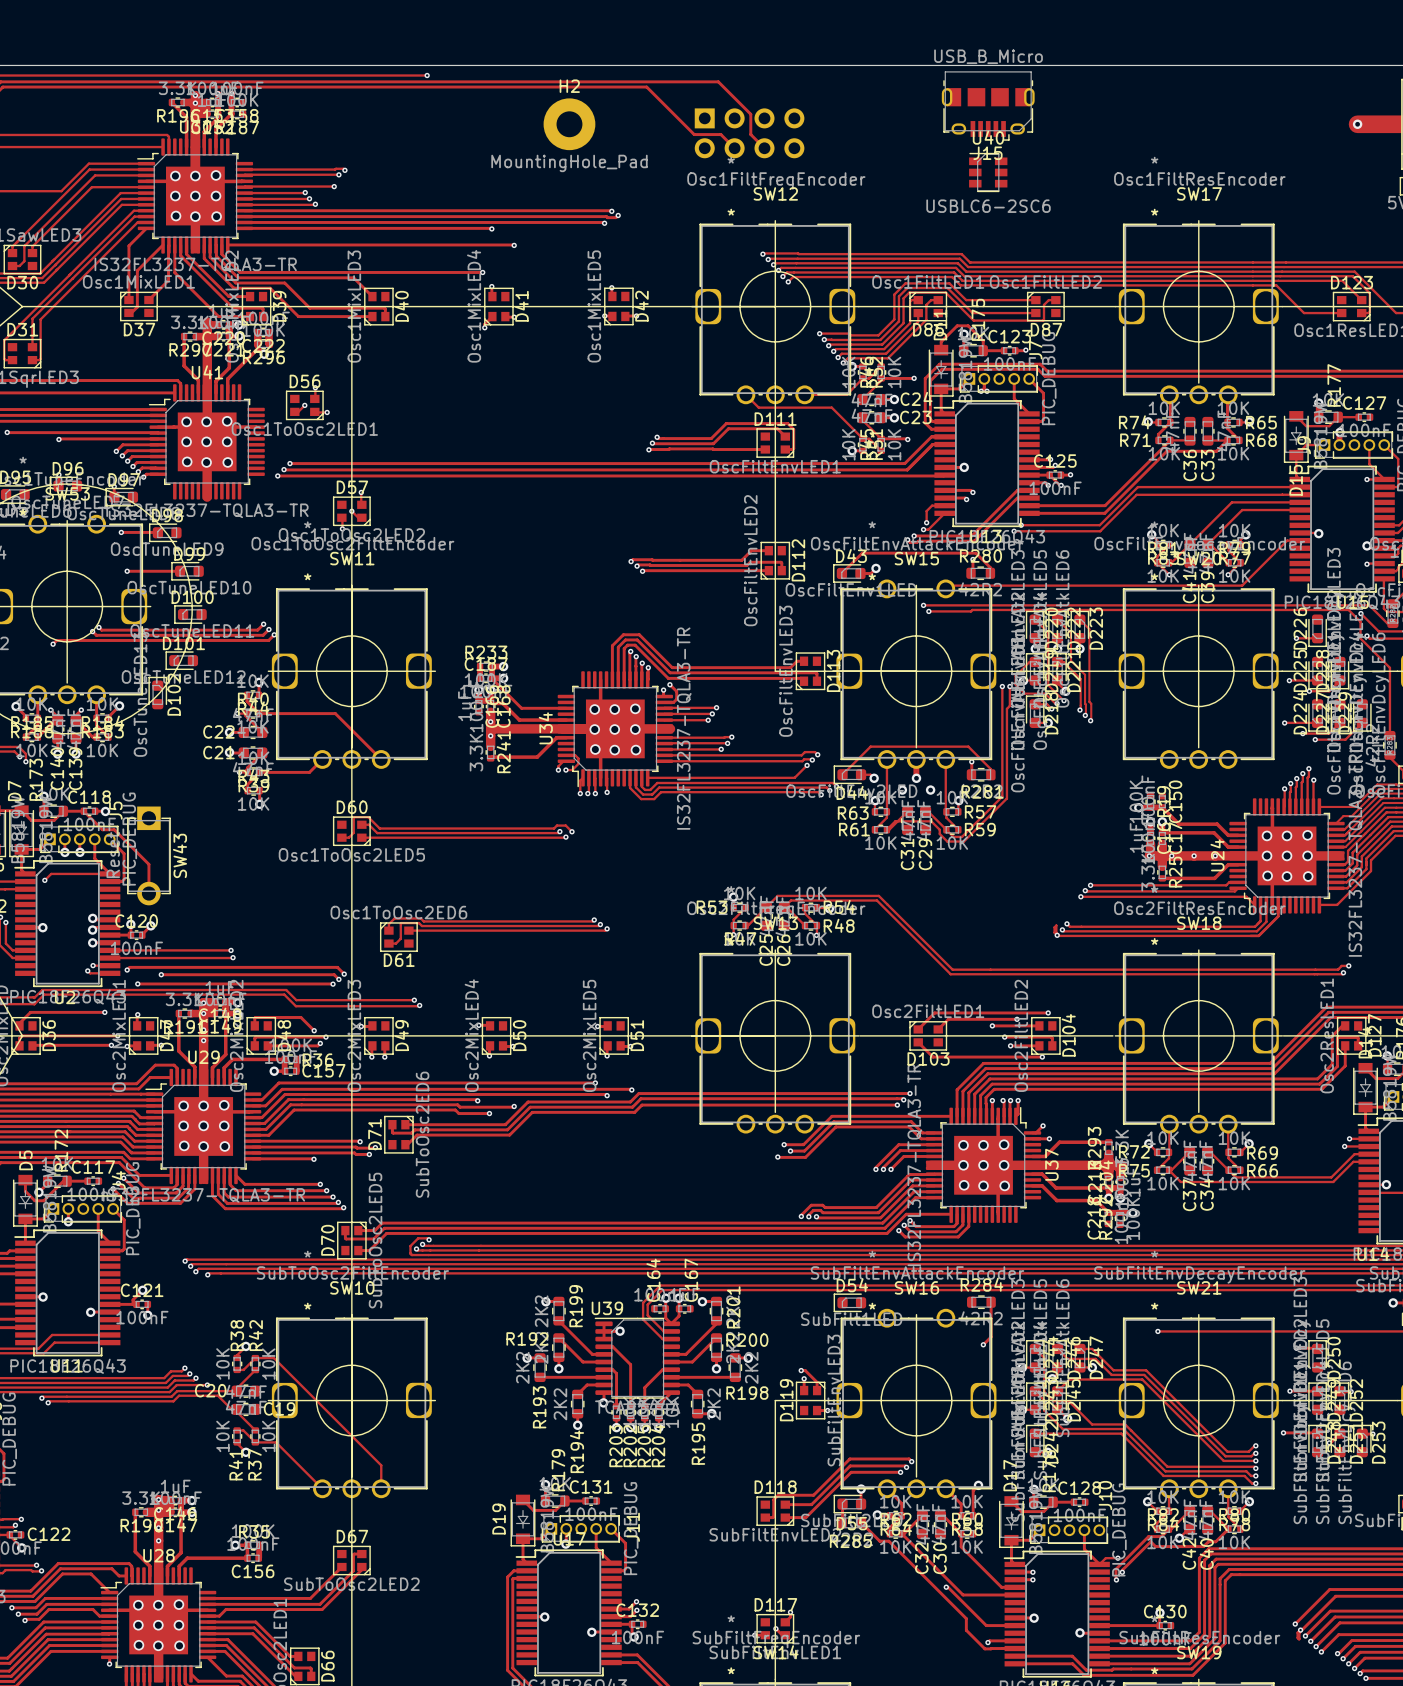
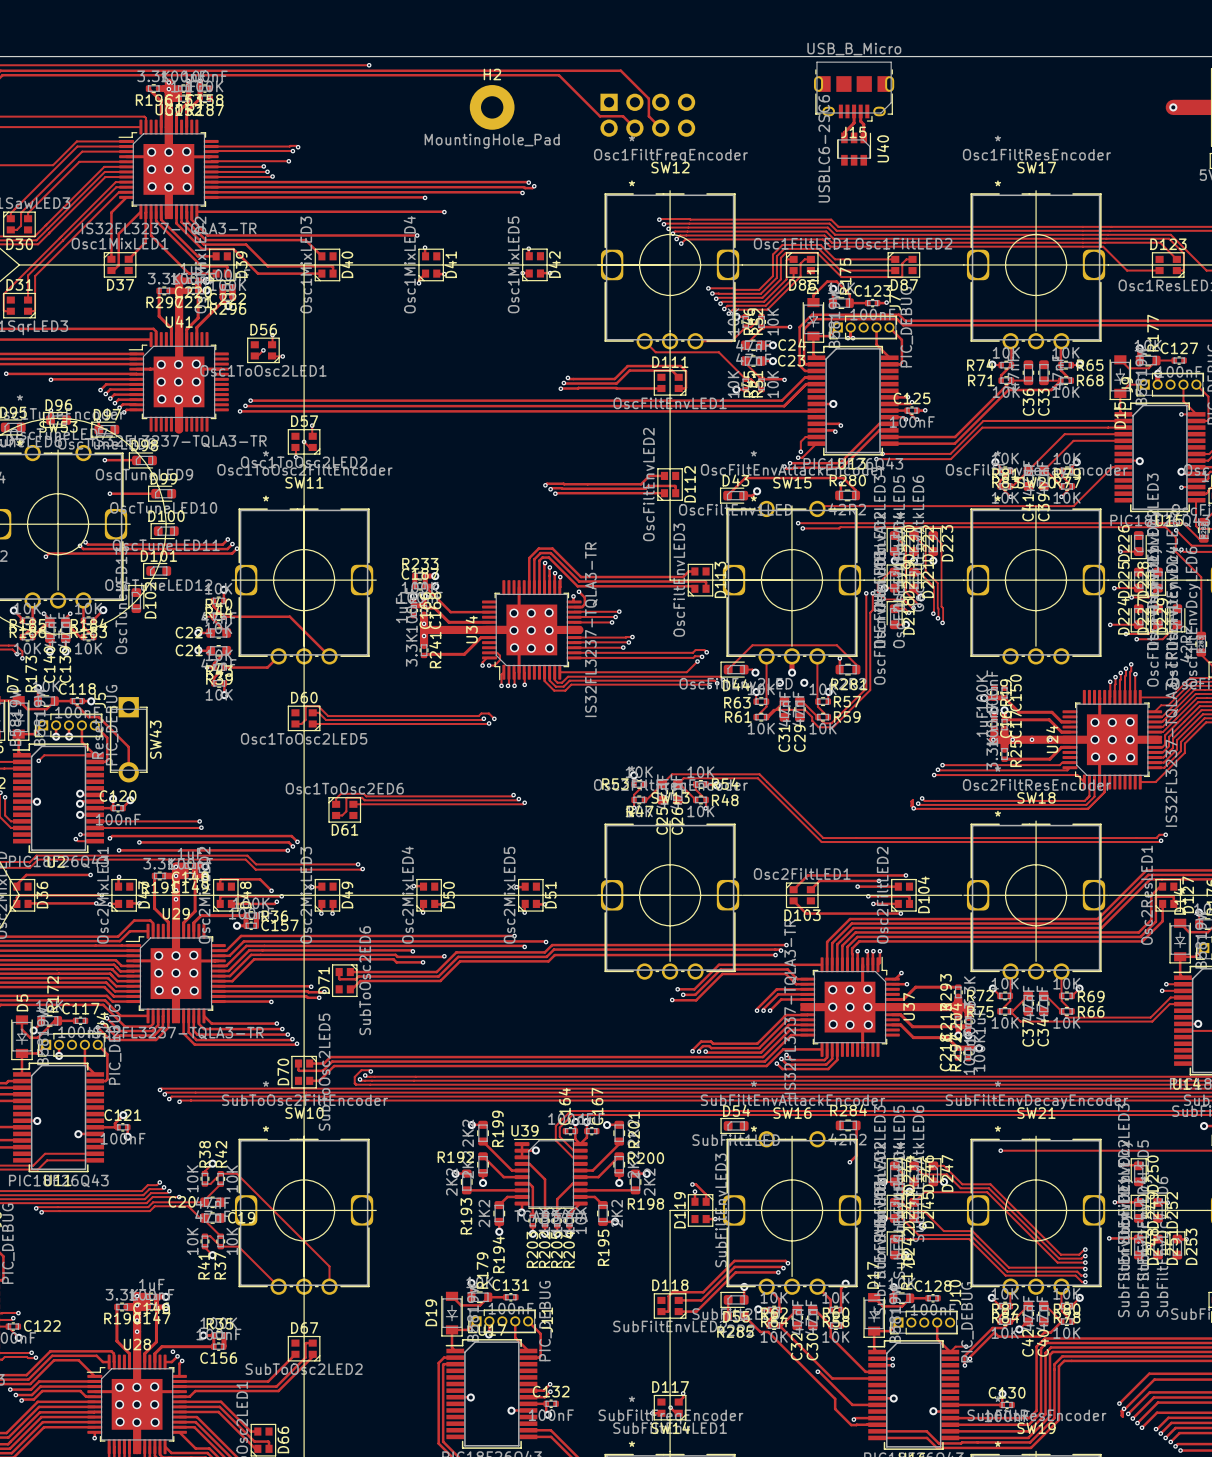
track: none -> (854, 111) (854, 122) (844, 132) (844, 137)
track: none -> (860, 111) (860, 121) (863, 124) (863, 137)
U40 rotation: 0° (988, 172) -> 90° clockwise (854, 149)
via: none -> (172, 1351)
track: none -> (177, 1356) (171, 1362) (165, 1362)
via: none -> (177, 1356)
track: none -> (182, 1360) (179, 1363) (179, 1376)
via: none -> (182, 1360)

